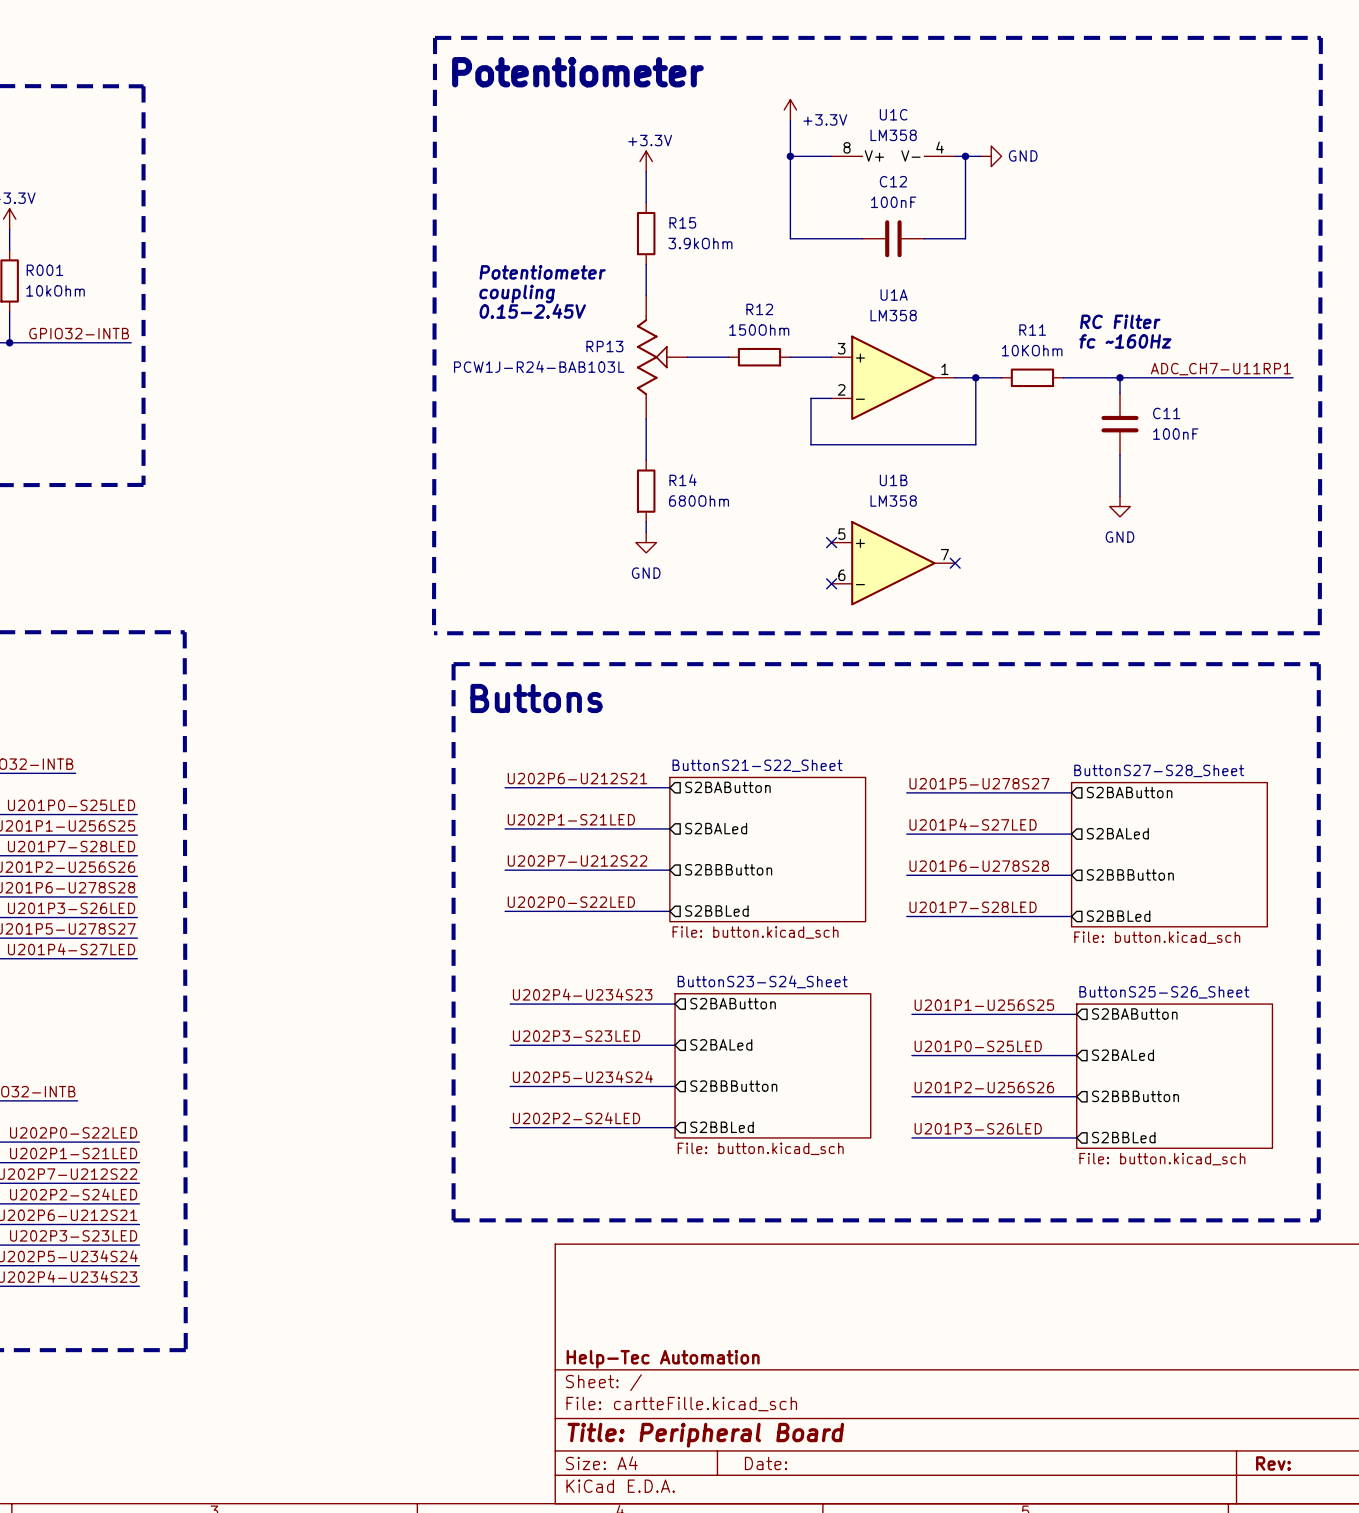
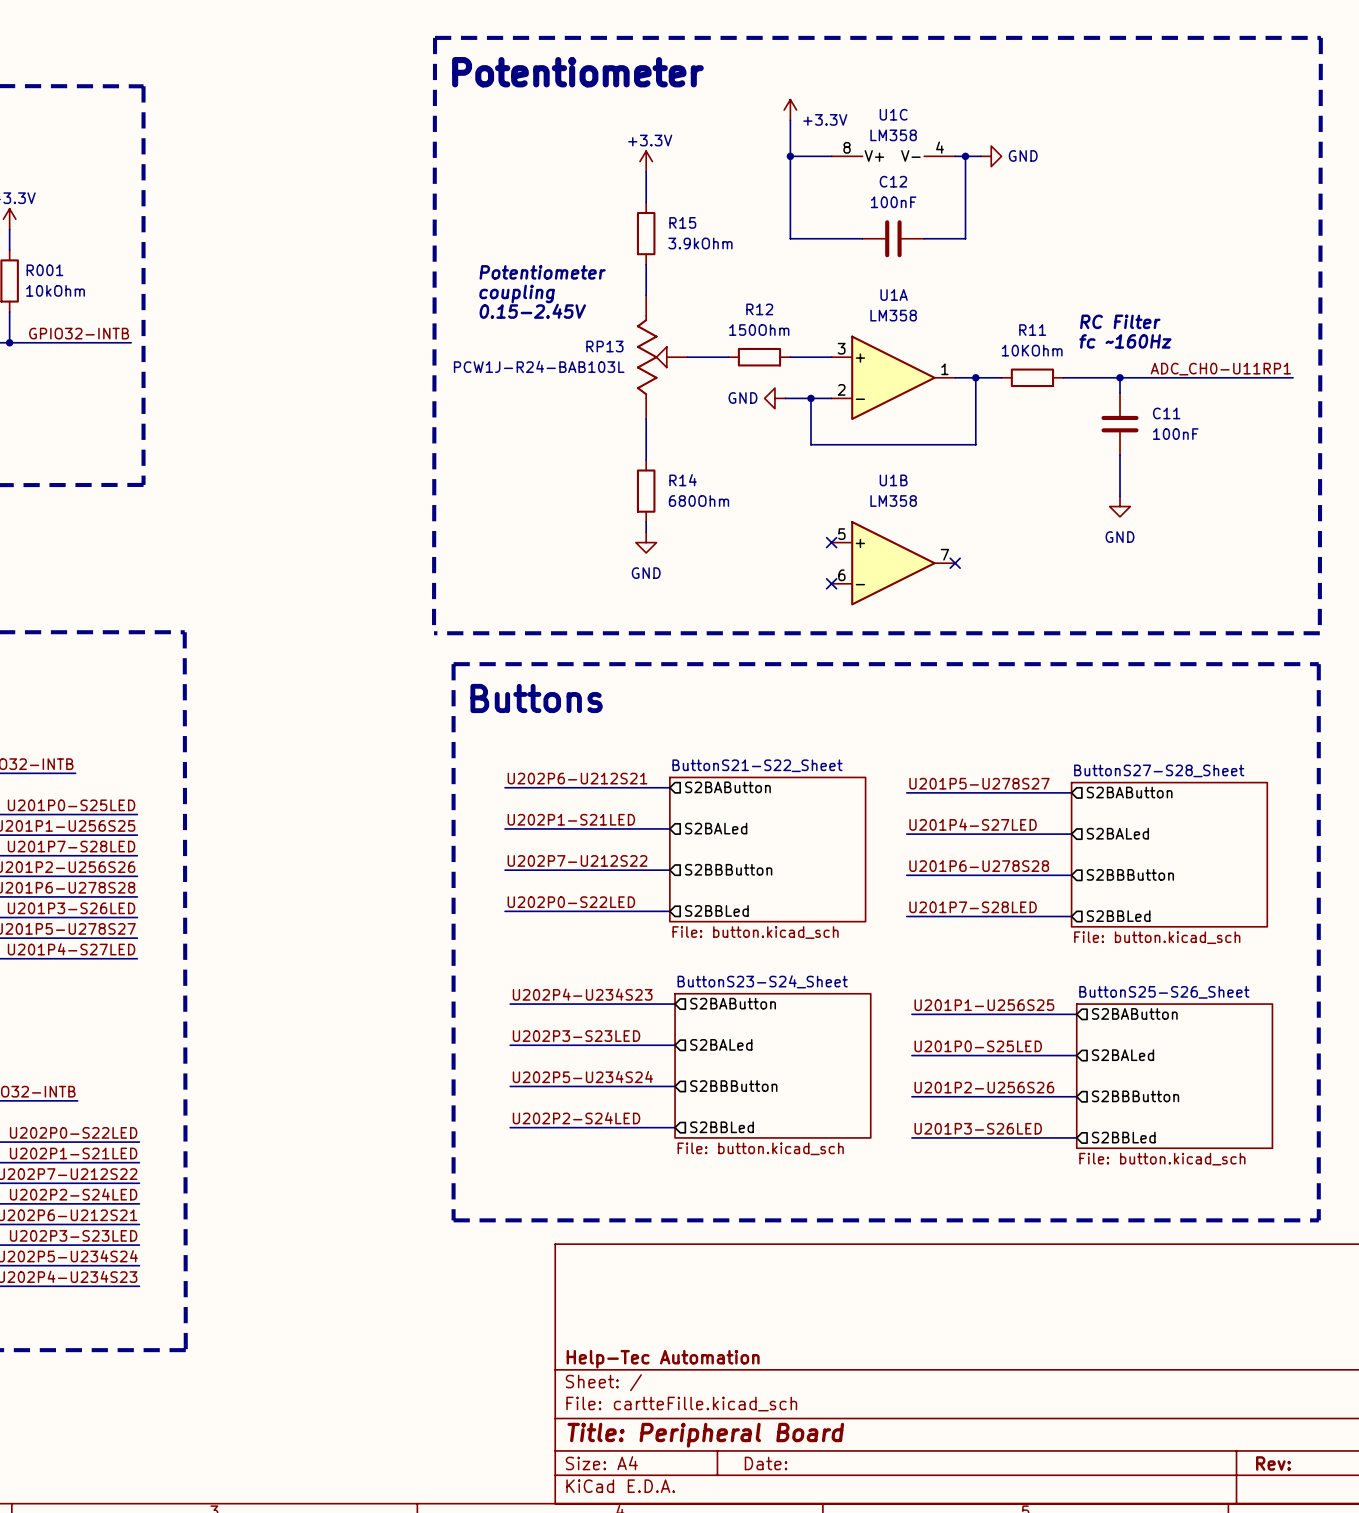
label: ADC_CH7-U11RP1 (1220, 369) -> ADC_CH0-U11RP1 (1220, 369)
power symbol: none -> GND (774, 398)
wire: none -> (785, 398) (810, 398)
junction: none -> (810, 398)

